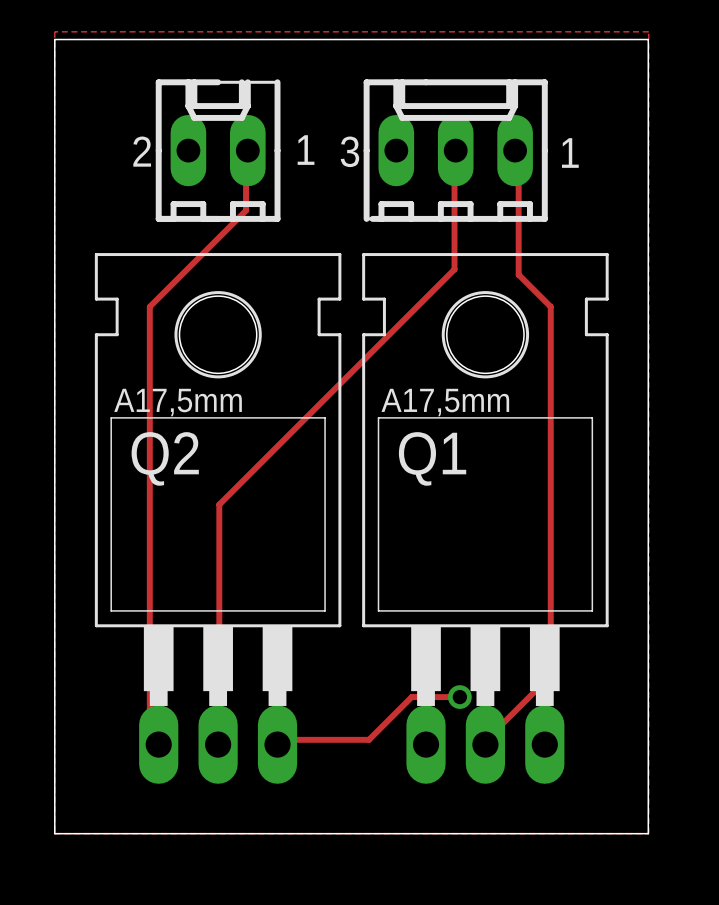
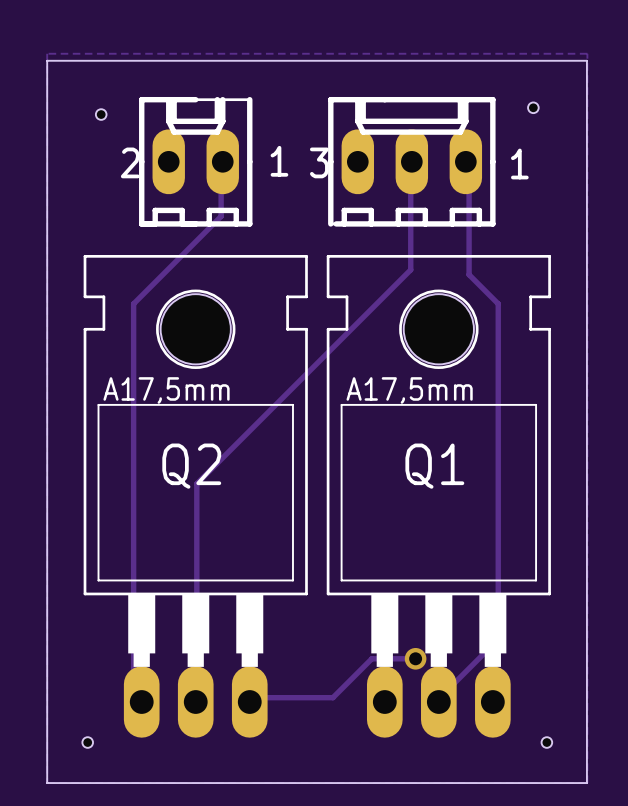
hole: none -> (533, 107)
hole: none -> (101, 114)
Q2 name position: Q2 (165, 458) -> Q2 (191, 466)
Q1 name position: Q1 (432, 458) -> Q1 (434, 466)
hole: none -> (87, 742)
hole: none -> (546, 742)

